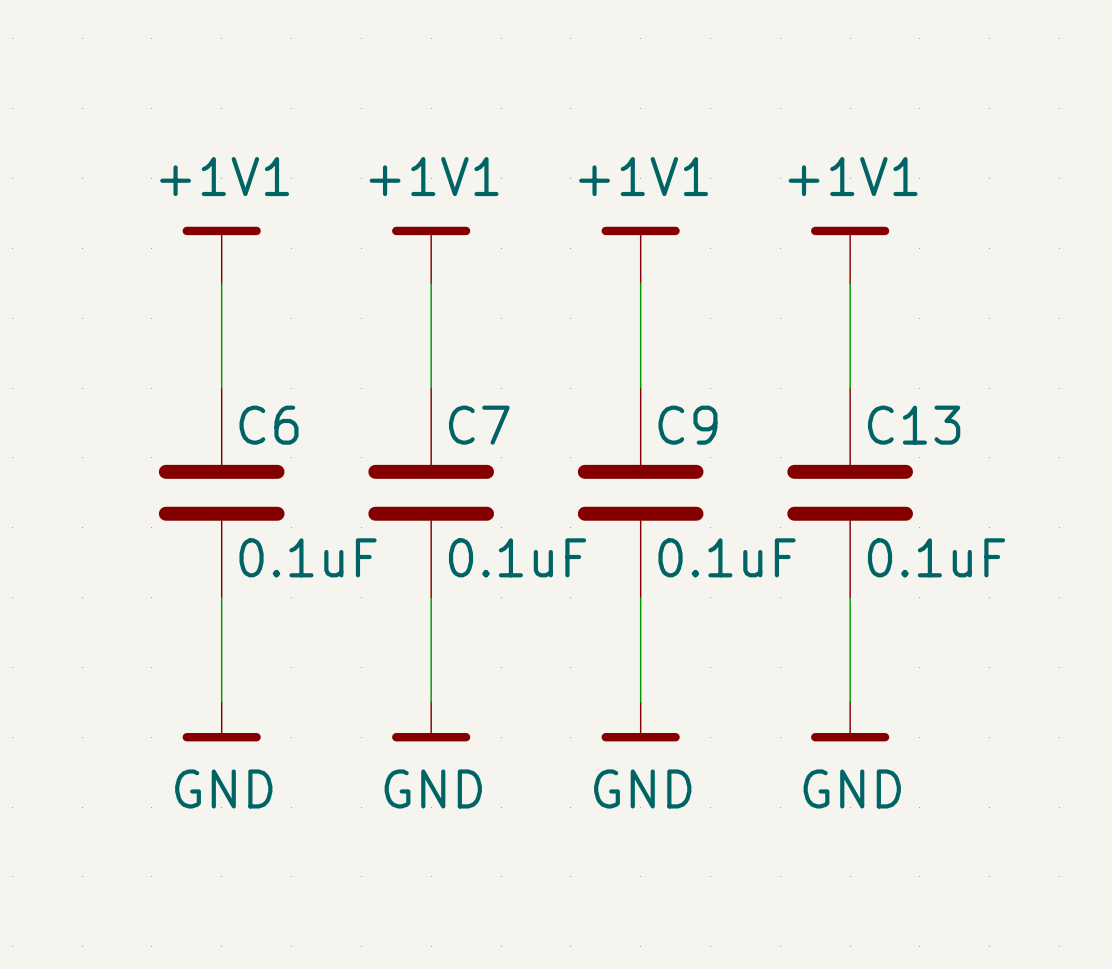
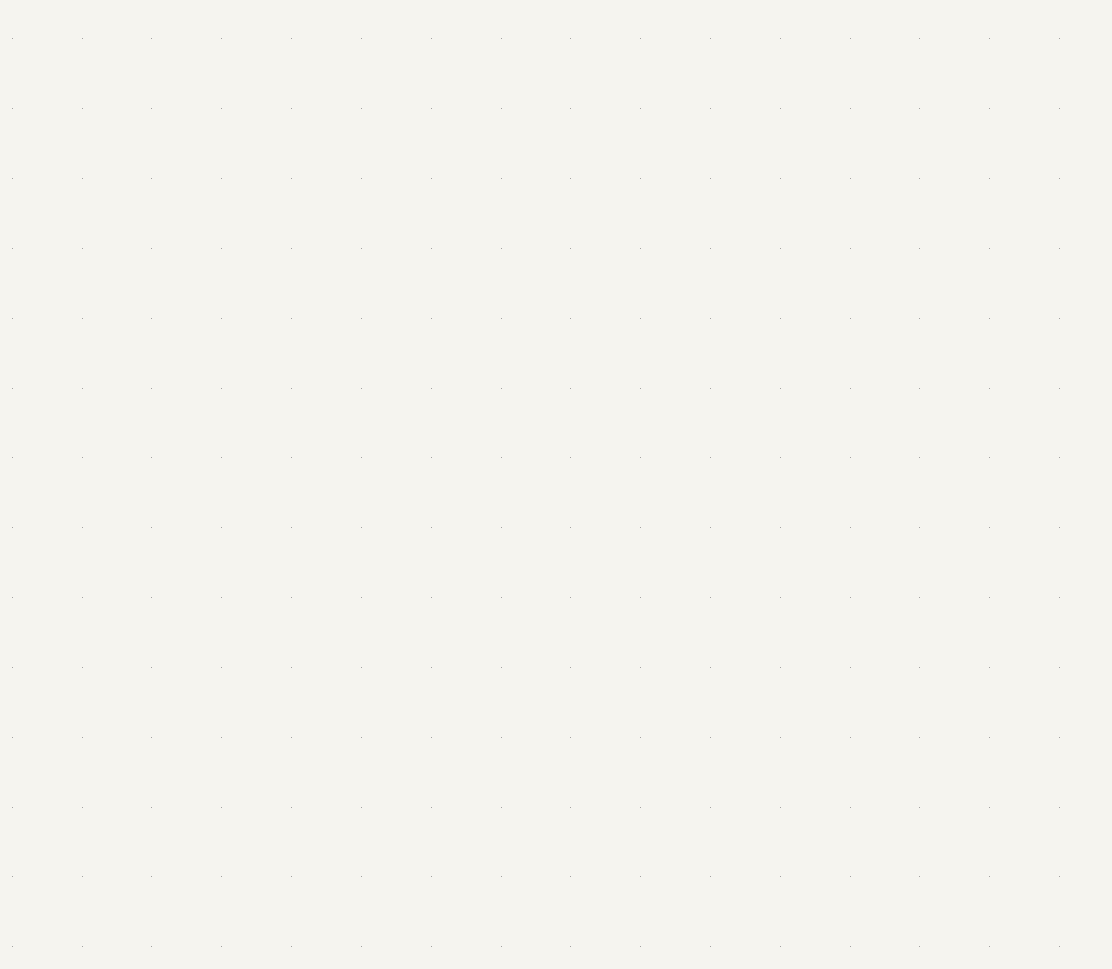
power symbol: +1V1 (221, 255) -> none
power symbol: +1V1 (431, 255) -> none
power symbol: +1V1 (640, 255) -> none
power symbol: +1V1 (850, 255) -> none
wire: (221, 283) (221, 388) -> none
wire: (431, 283) (431, 388) -> none
wire: (640, 283) (640, 388) -> none
wire: (850, 283) (850, 388) -> none
C6: 0.1uF (221, 492) -> none
C7: 0.1uF (431, 492) -> none
C9: 0.1uF (640, 492) -> none
C13: 0.1uF (850, 492) -> none
wire: (221, 597) (221, 702) -> none
wire: (431, 597) (431, 702) -> none
wire: (640, 597) (640, 702) -> none
wire: (850, 597) (850, 702) -> none
power symbol: GND (221, 721) -> none
power symbol: GND (431, 721) -> none
power symbol: GND (640, 721) -> none
power symbol: GND (850, 721) -> none

